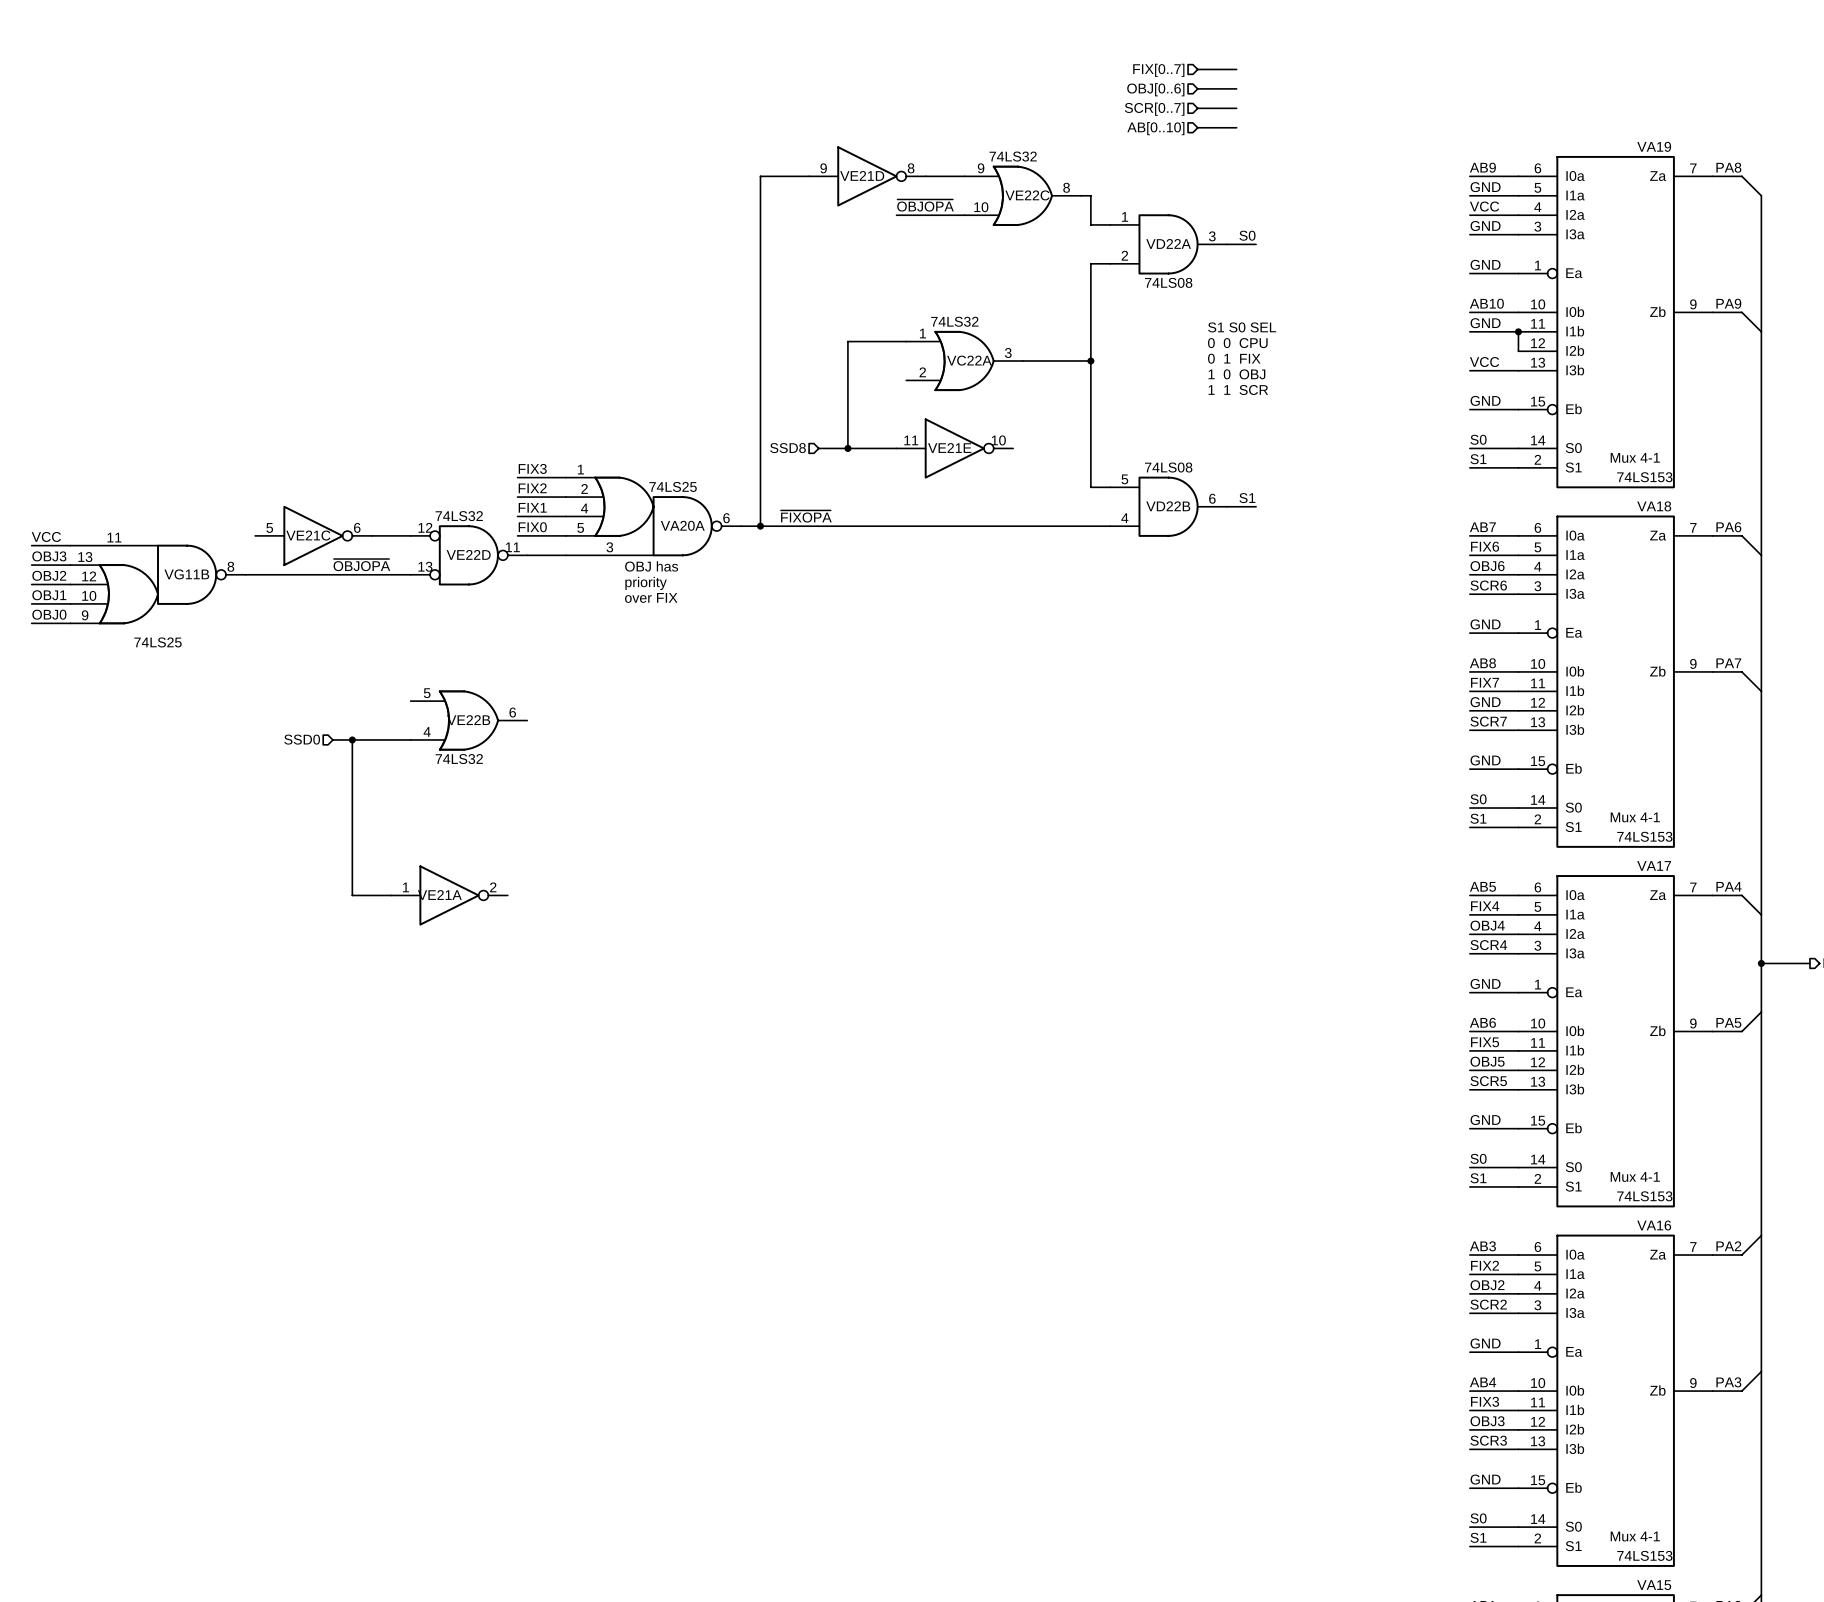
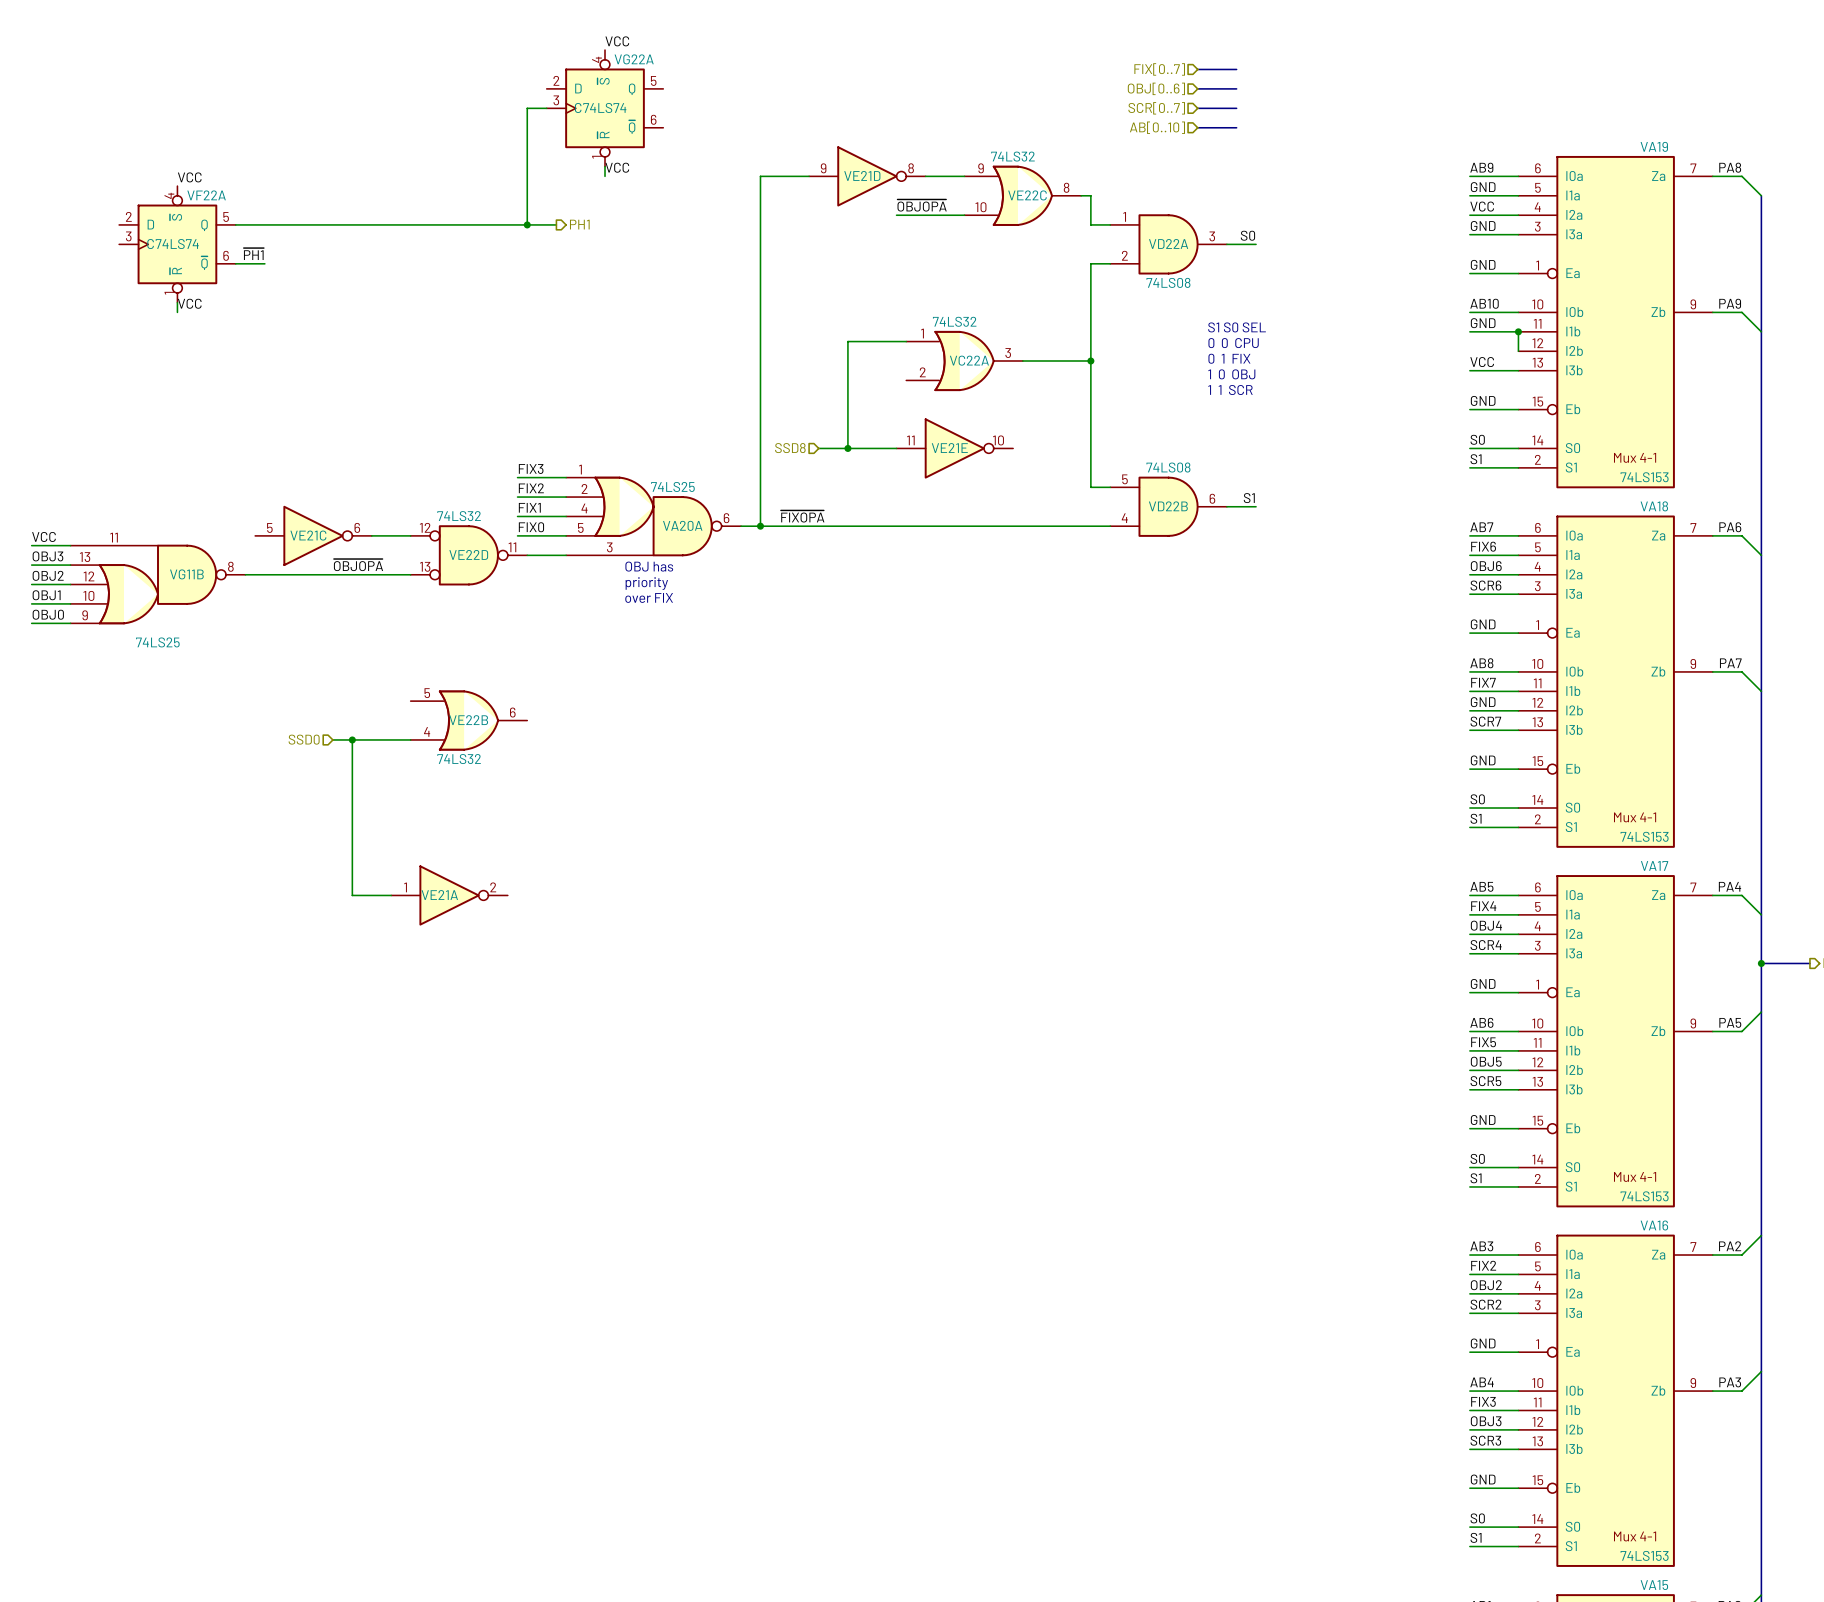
label: none -> VCC (617, 41)
wire: none -> (546, 108) (527, 108) (527, 224)
VG22A: none -> 74LS74 (605, 108)
wire: none -> (605, 166) (605, 176)
label: none -> VCC (617, 167)
label: none -> VCC (189, 177)
wire: none -> (235, 224) (556, 224)
junction: none -> (527, 224)
hierarchical label: none -> PH1 (579, 224)
VF22A: none -> 74LS74 (177, 244)
label: none -> ~{PH1} (253, 254)
wire: none -> (235, 263) (264, 263)
wire: none -> (177, 302) (177, 312)
label: none -> VCC (189, 303)

